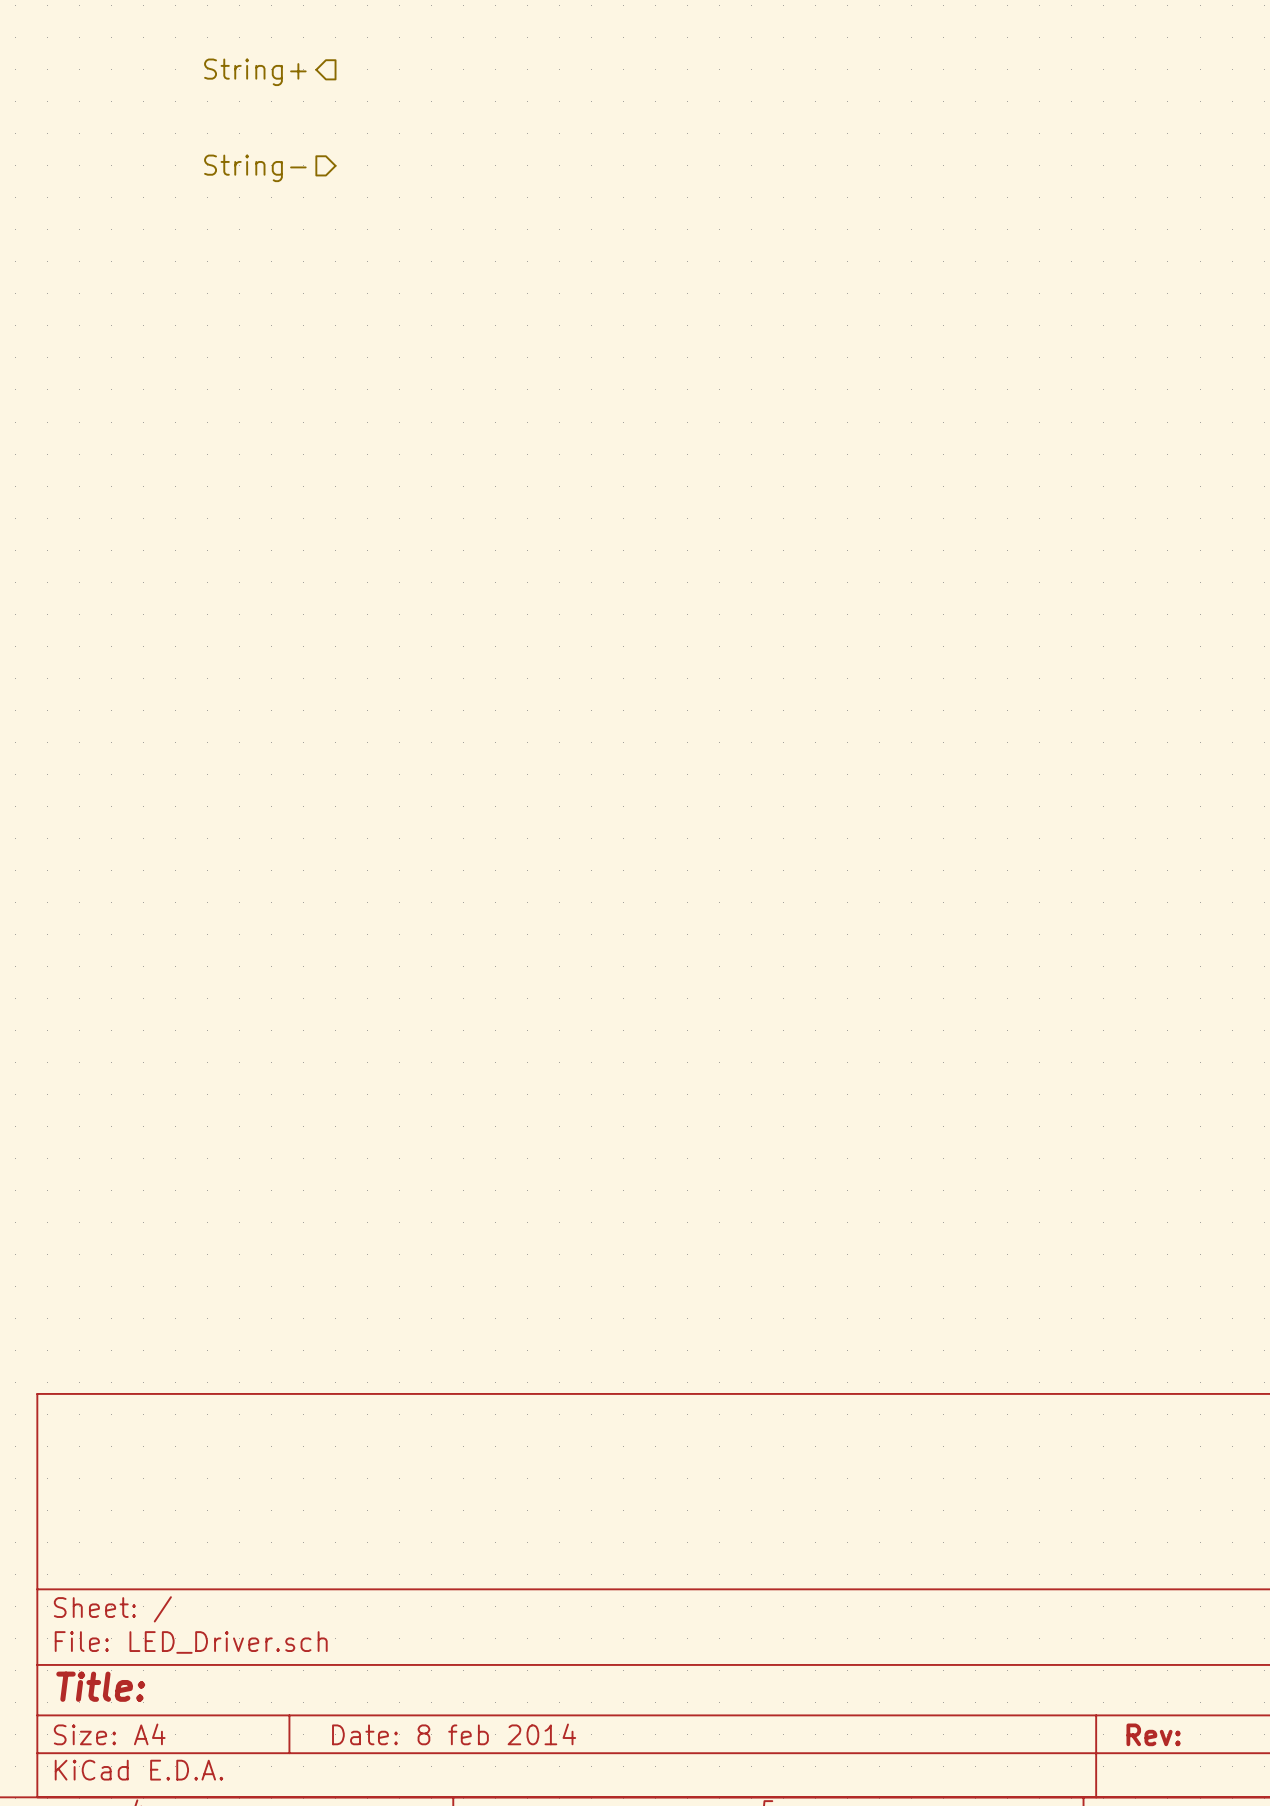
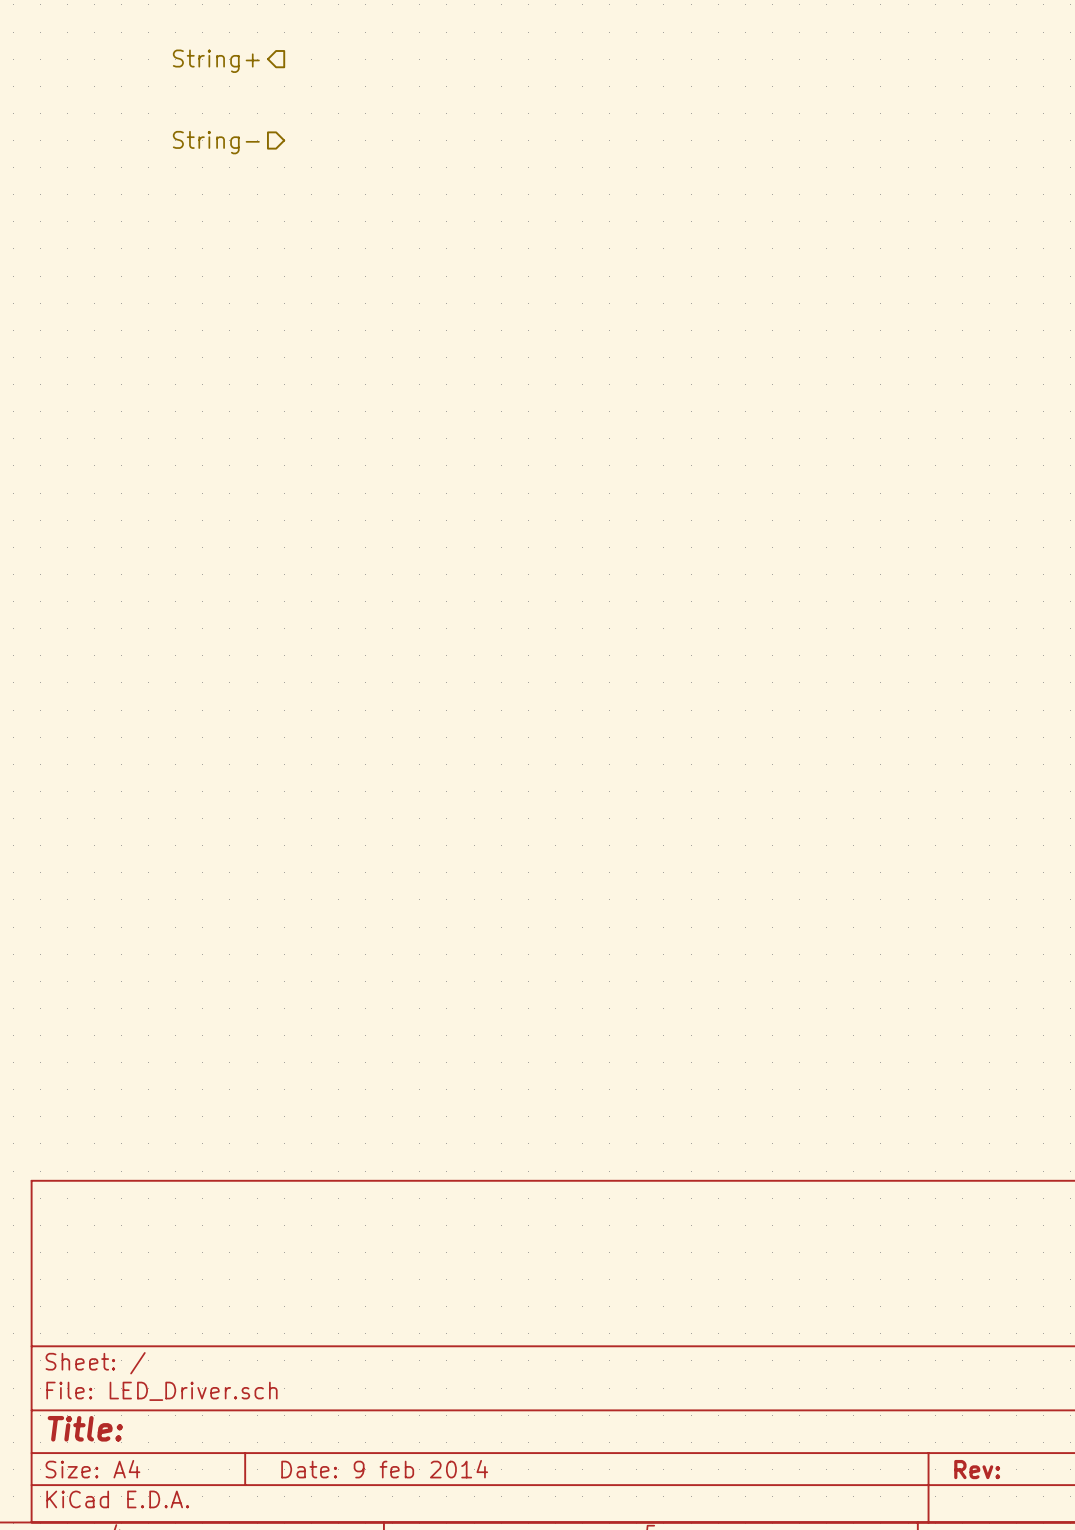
title block: Date: 8 feb 2014 (454, 1734) -> Date: 9 feb 2014 (384, 1469)

